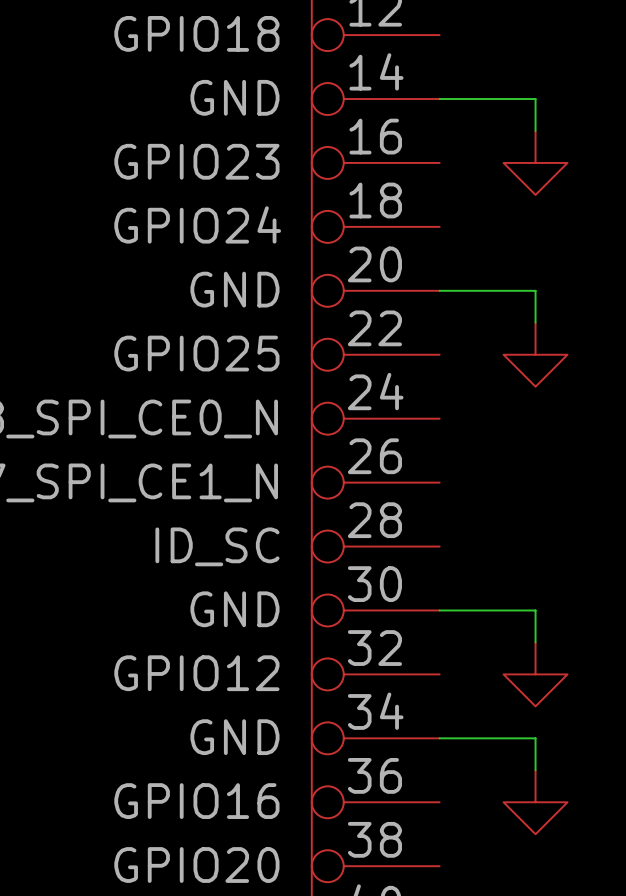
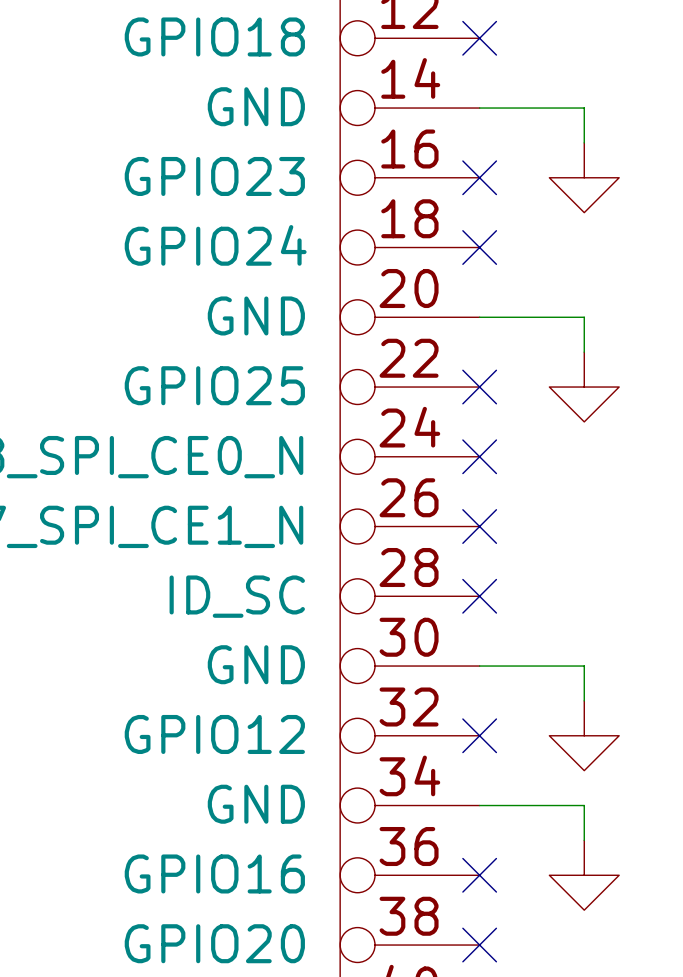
no-connect mark: none -> (479, 38)
no-connect mark: none -> (479, 177)
no-connect mark: none -> (479, 247)
no-connect mark: none -> (479, 387)
no-connect mark: none -> (479, 456)
no-connect mark: none -> (479, 526)
no-connect mark: none -> (479, 596)
no-connect mark: none -> (479, 735)
no-connect mark: none -> (479, 875)
no-connect mark: none -> (479, 945)

